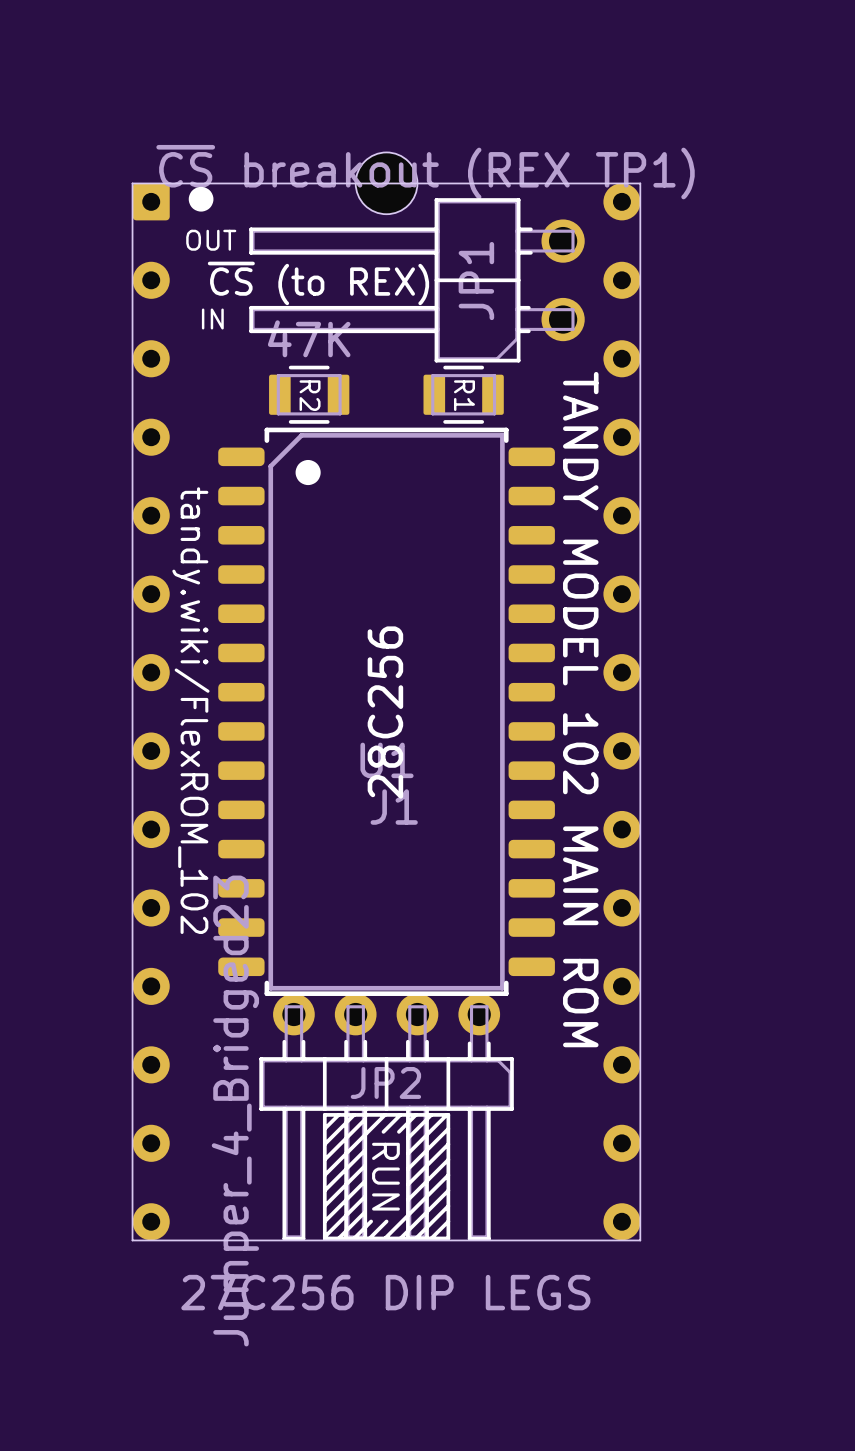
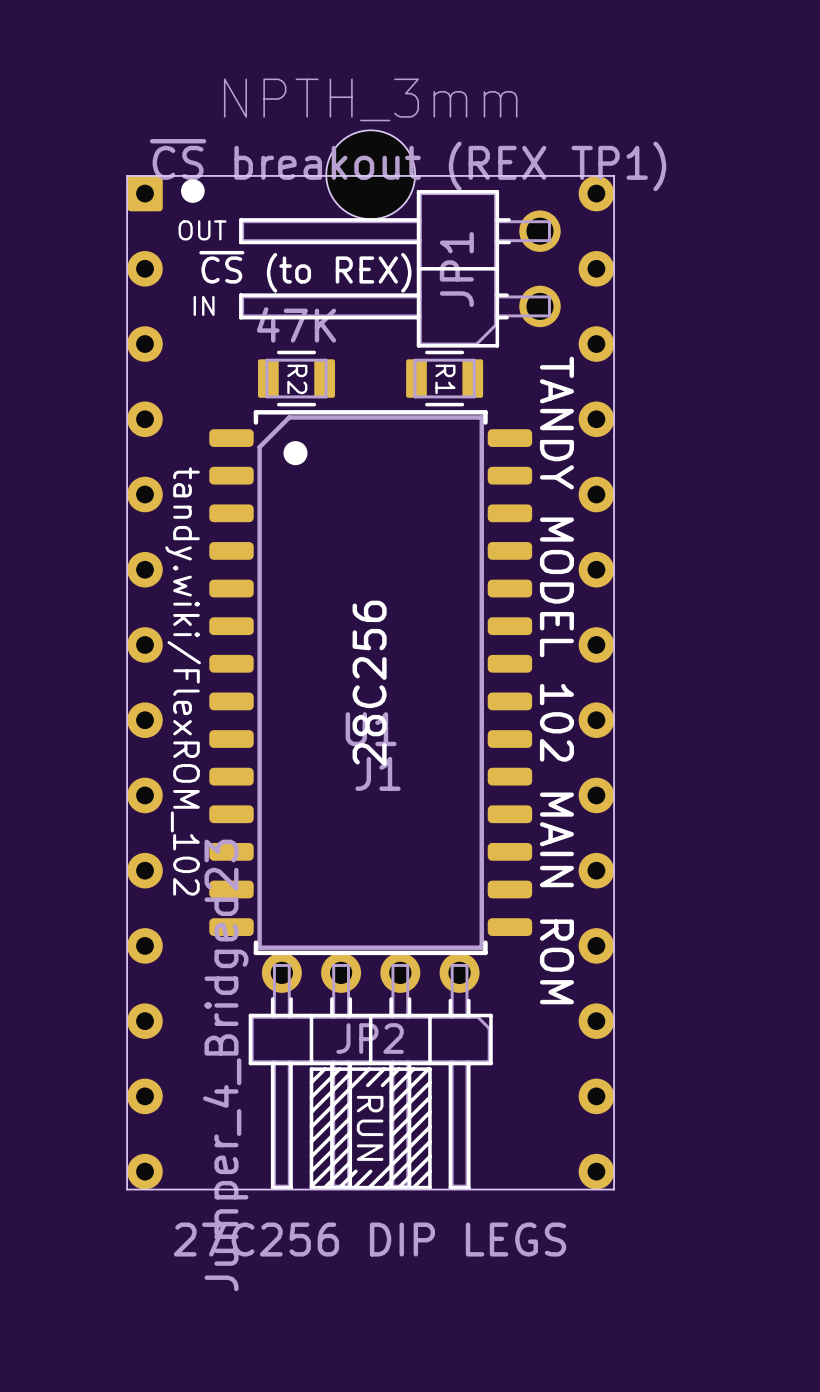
J1 footprint: [132, 152, 641, 1241] -> [127, 175, 615, 1190]
part: none -> NPTH_3mm (370, 174)

